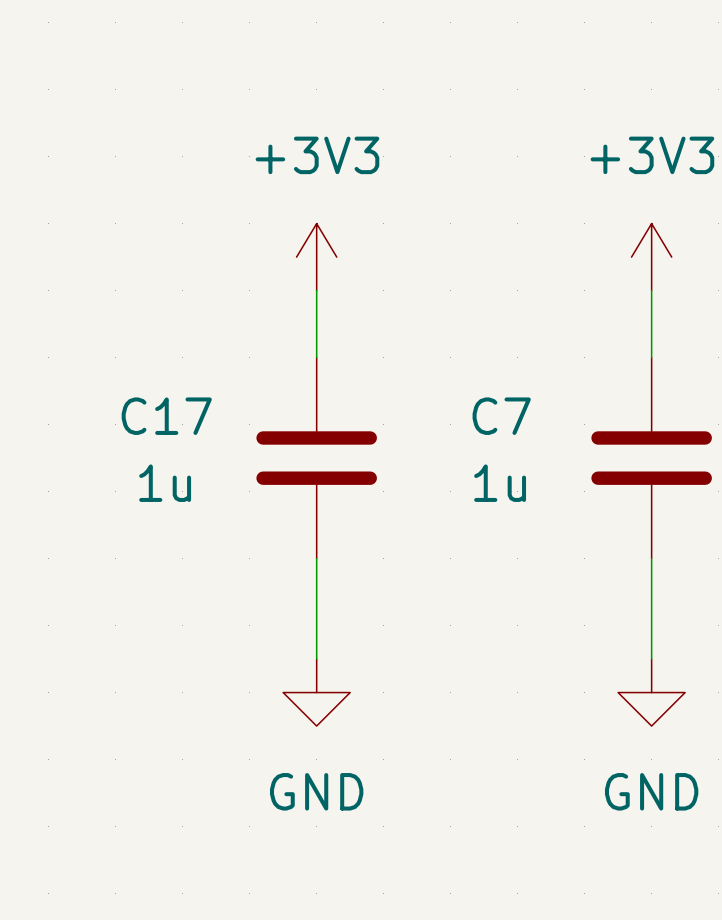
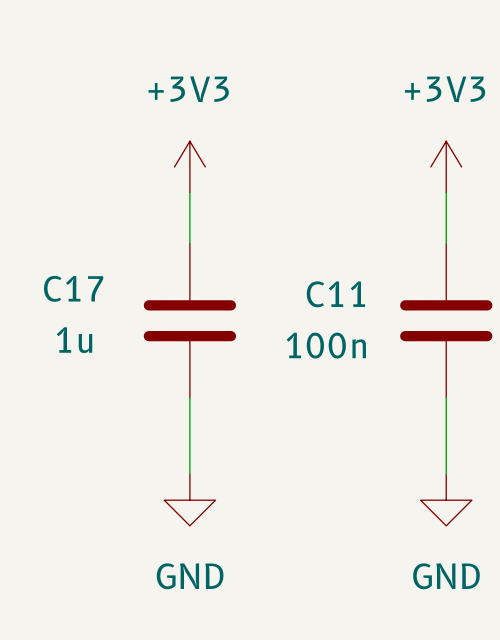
C7 name: C7 (501, 416) -> C11 (335, 294)
C7 value: 1u (500, 483) -> 100n (326, 345)

